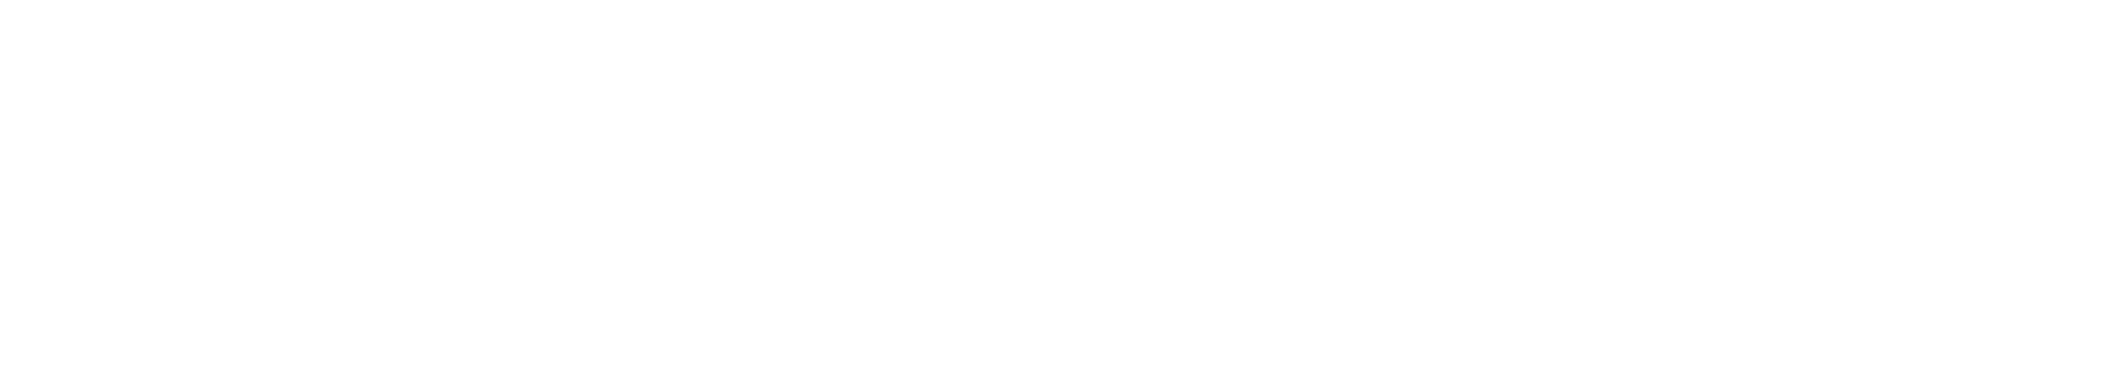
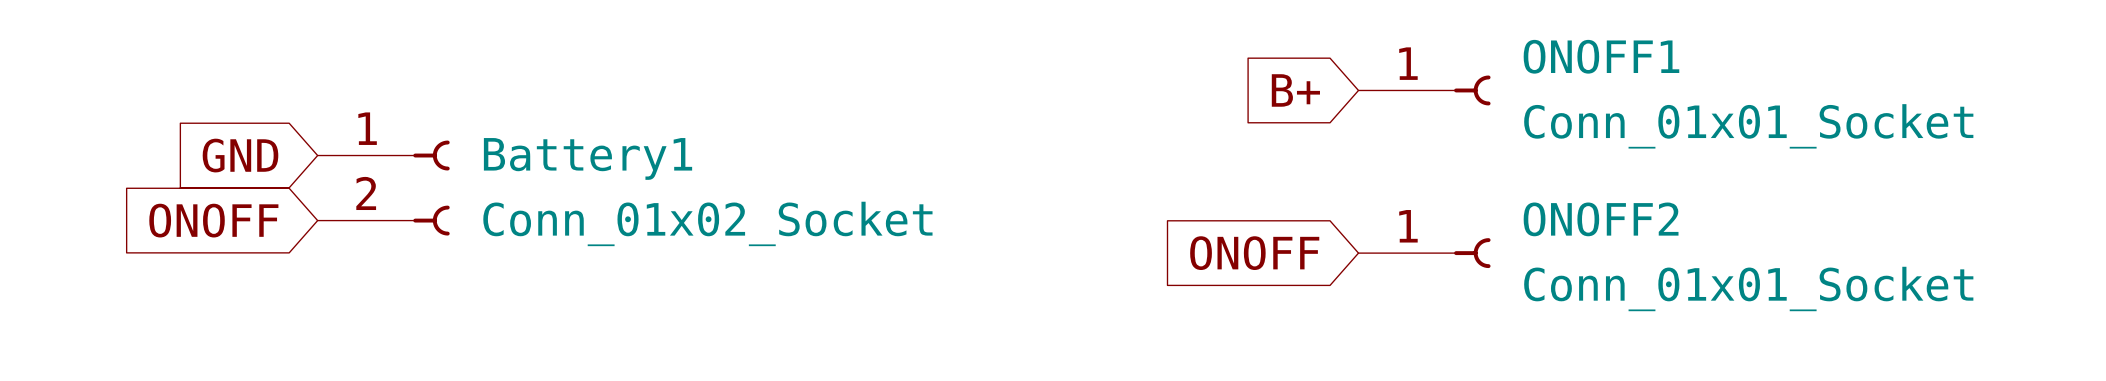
global label: none -> B+ (1295, 90)
ONOFF1: none -> Conn_01x01_Socket (1424, 90)
global label: none -> GND (240, 155)
Battery1: none -> Conn_01x02_Socket (383, 188)
global label: none -> ONOFF (213, 220)
global label: none -> ONOFF (1254, 253)
ONOFF2: none -> Conn_01x01_Socket (1424, 253)

